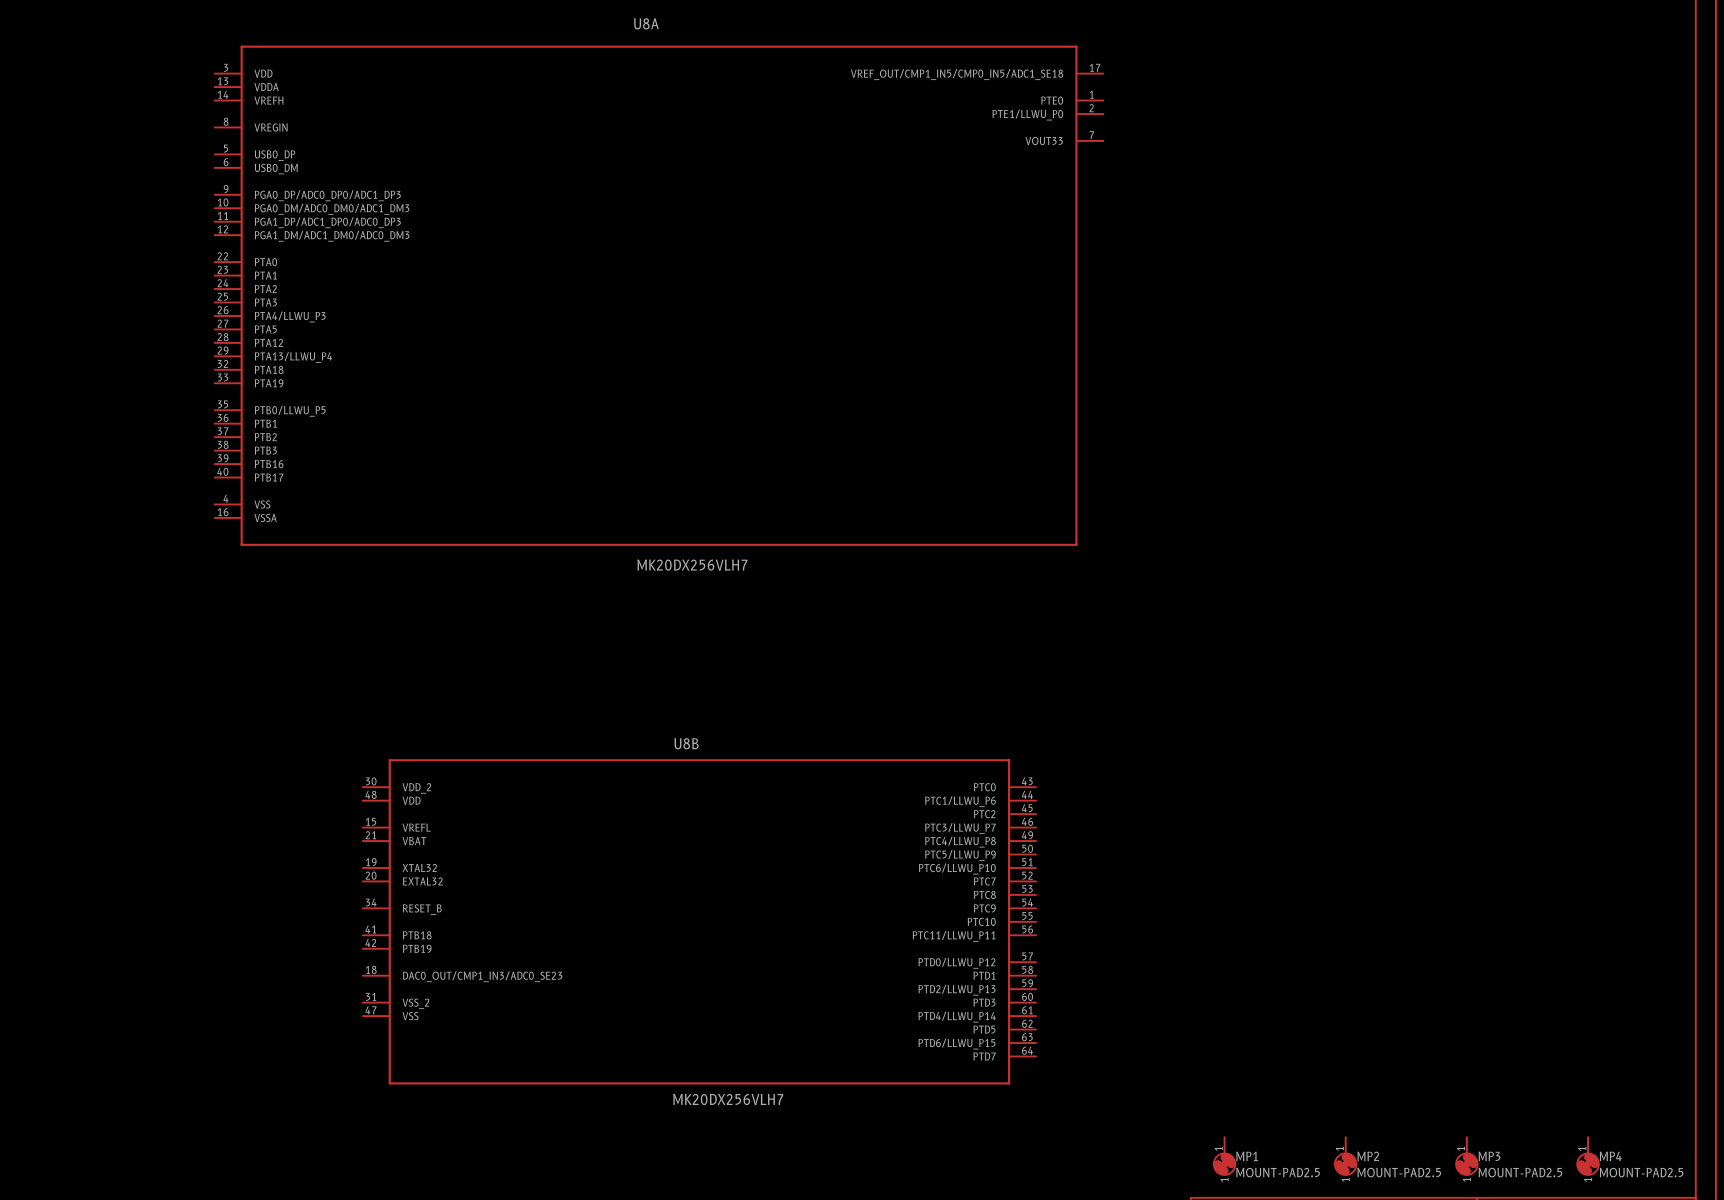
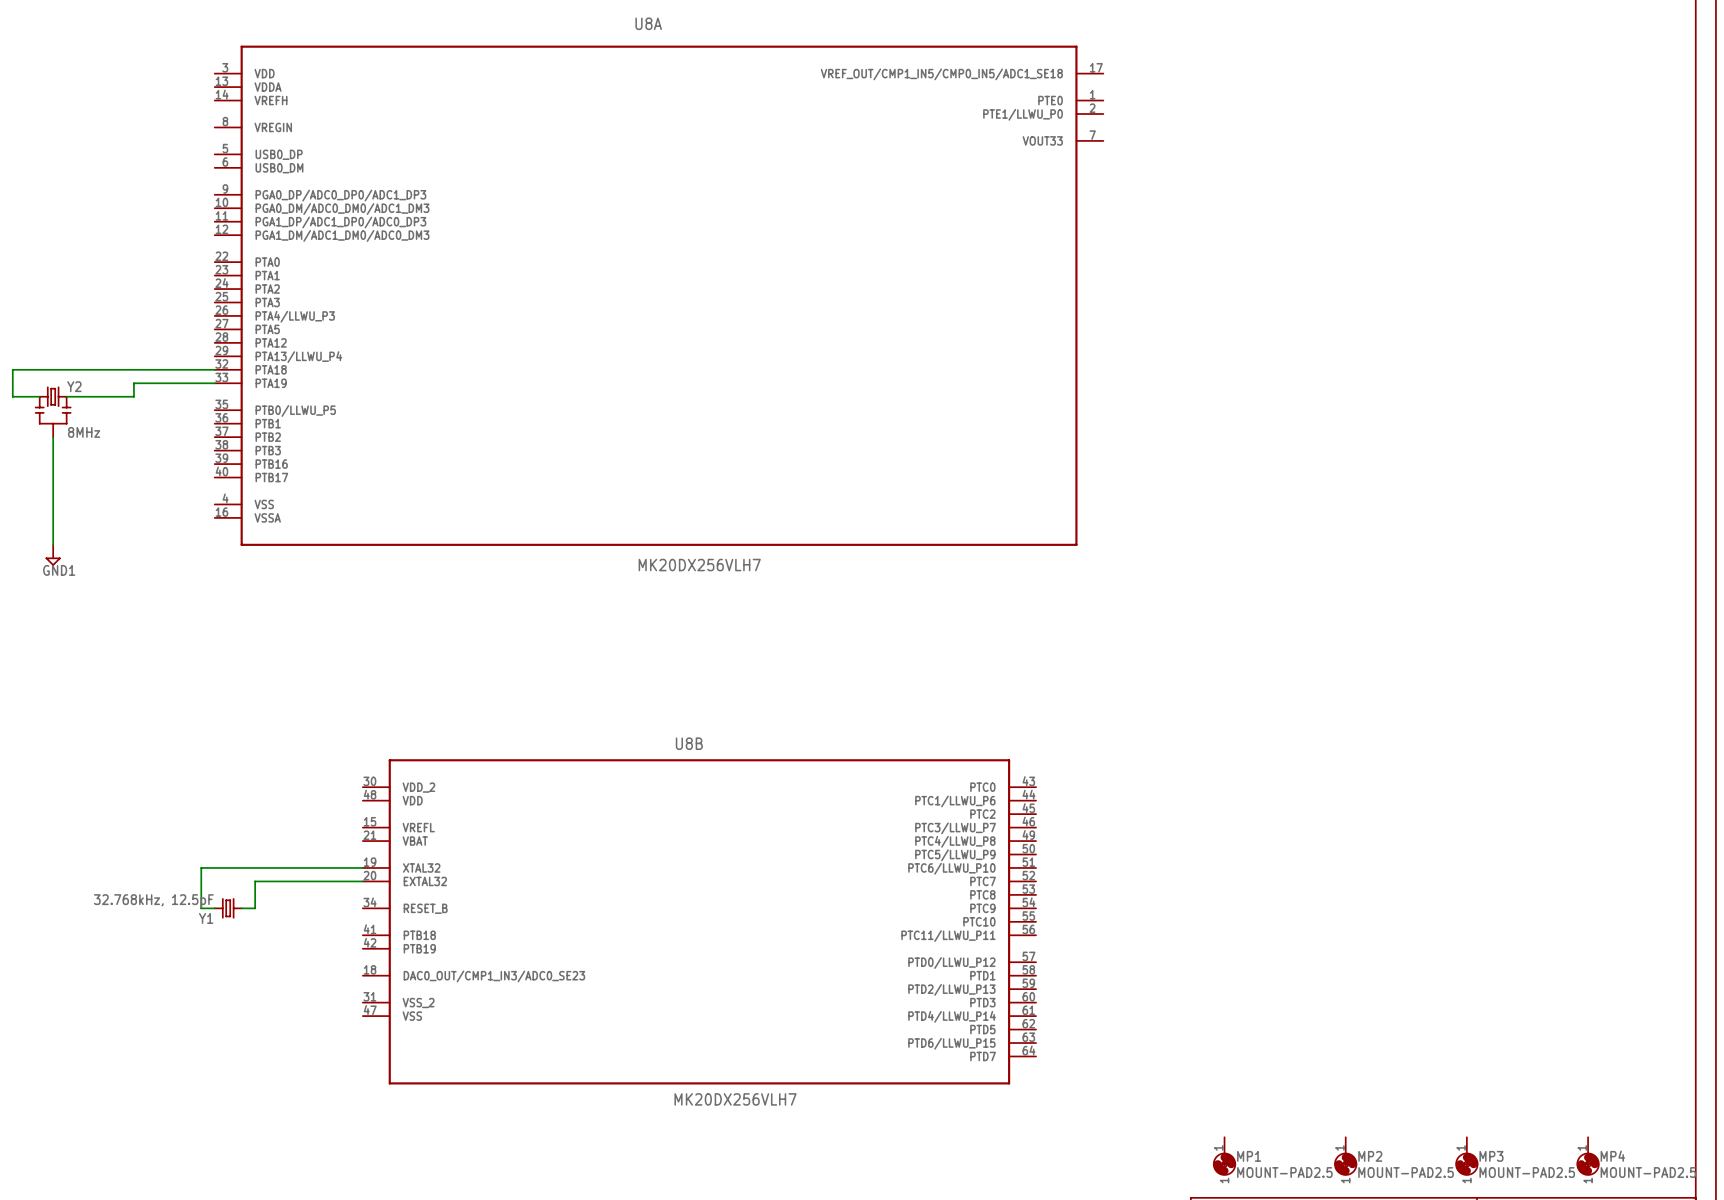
wire: none -> (214, 369) (12, 369) (12, 396) (39, 396)
wire: none -> (214, 383) (133, 383) (133, 396) (66, 396)
Y2: none -> 8MHz (53, 412)
wire: none -> (53, 437) (53, 544)
power symbol: none -> GND1 (53, 555)
wire: none -> (362, 867) (201, 867) (201, 908) (214, 908)
wire: none -> (362, 881) (255, 881) (255, 908) (241, 908)
Y1: none -> 32.768kHz, 12.5pF (228, 908)

